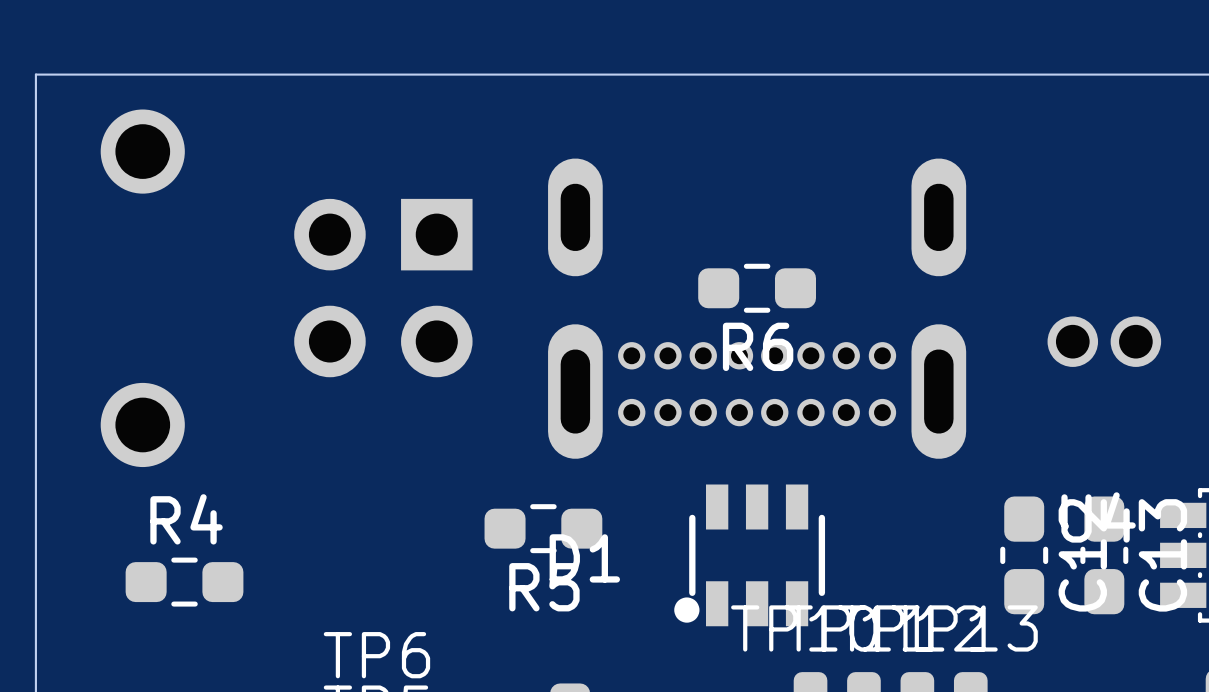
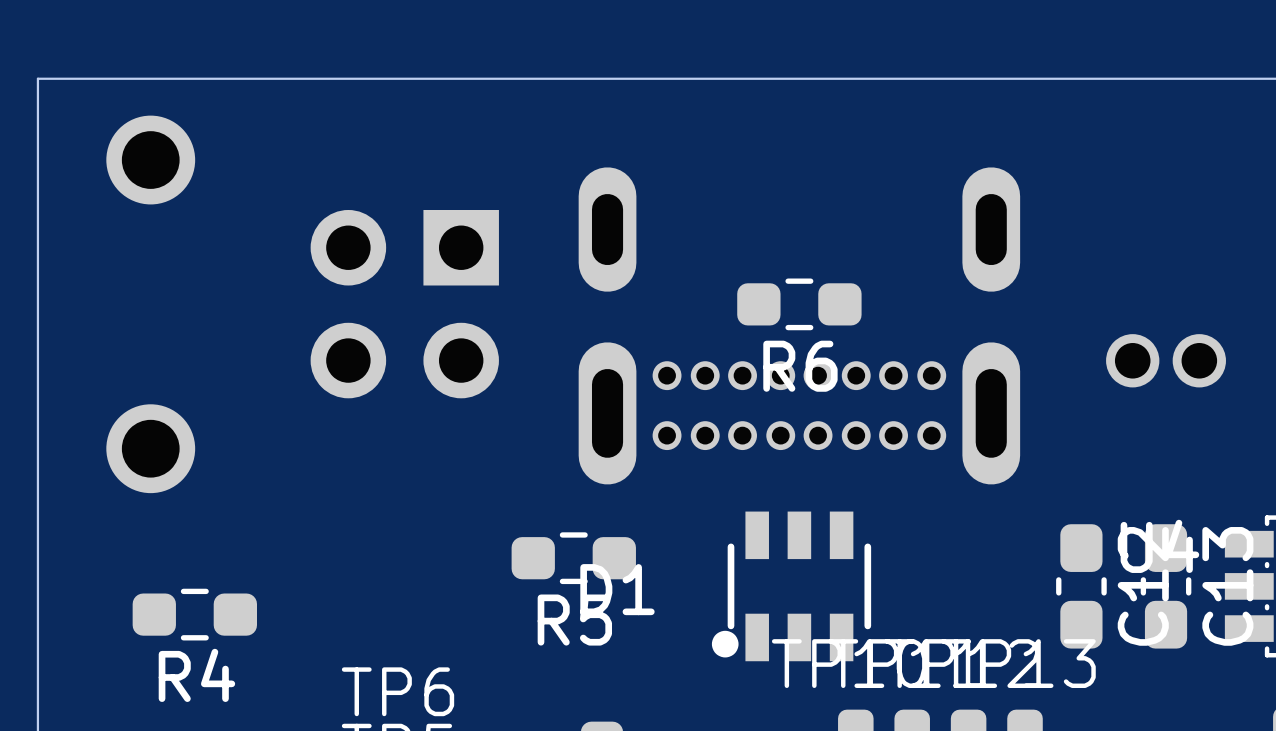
R4 name position: R4 (186, 519) -> R4 (196, 675)

